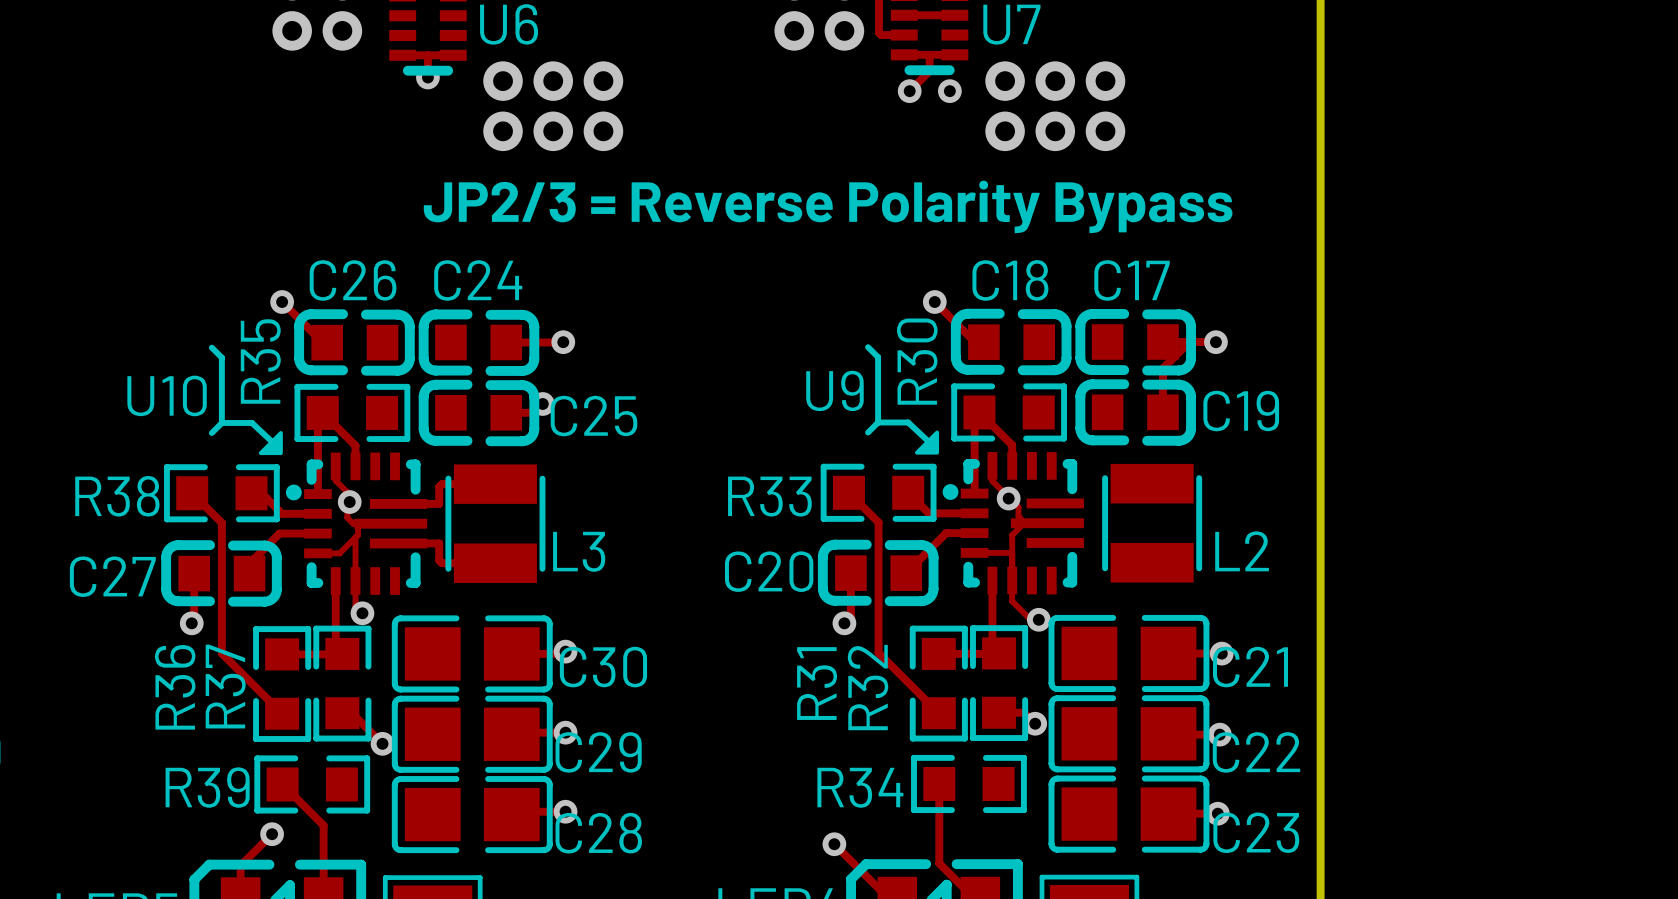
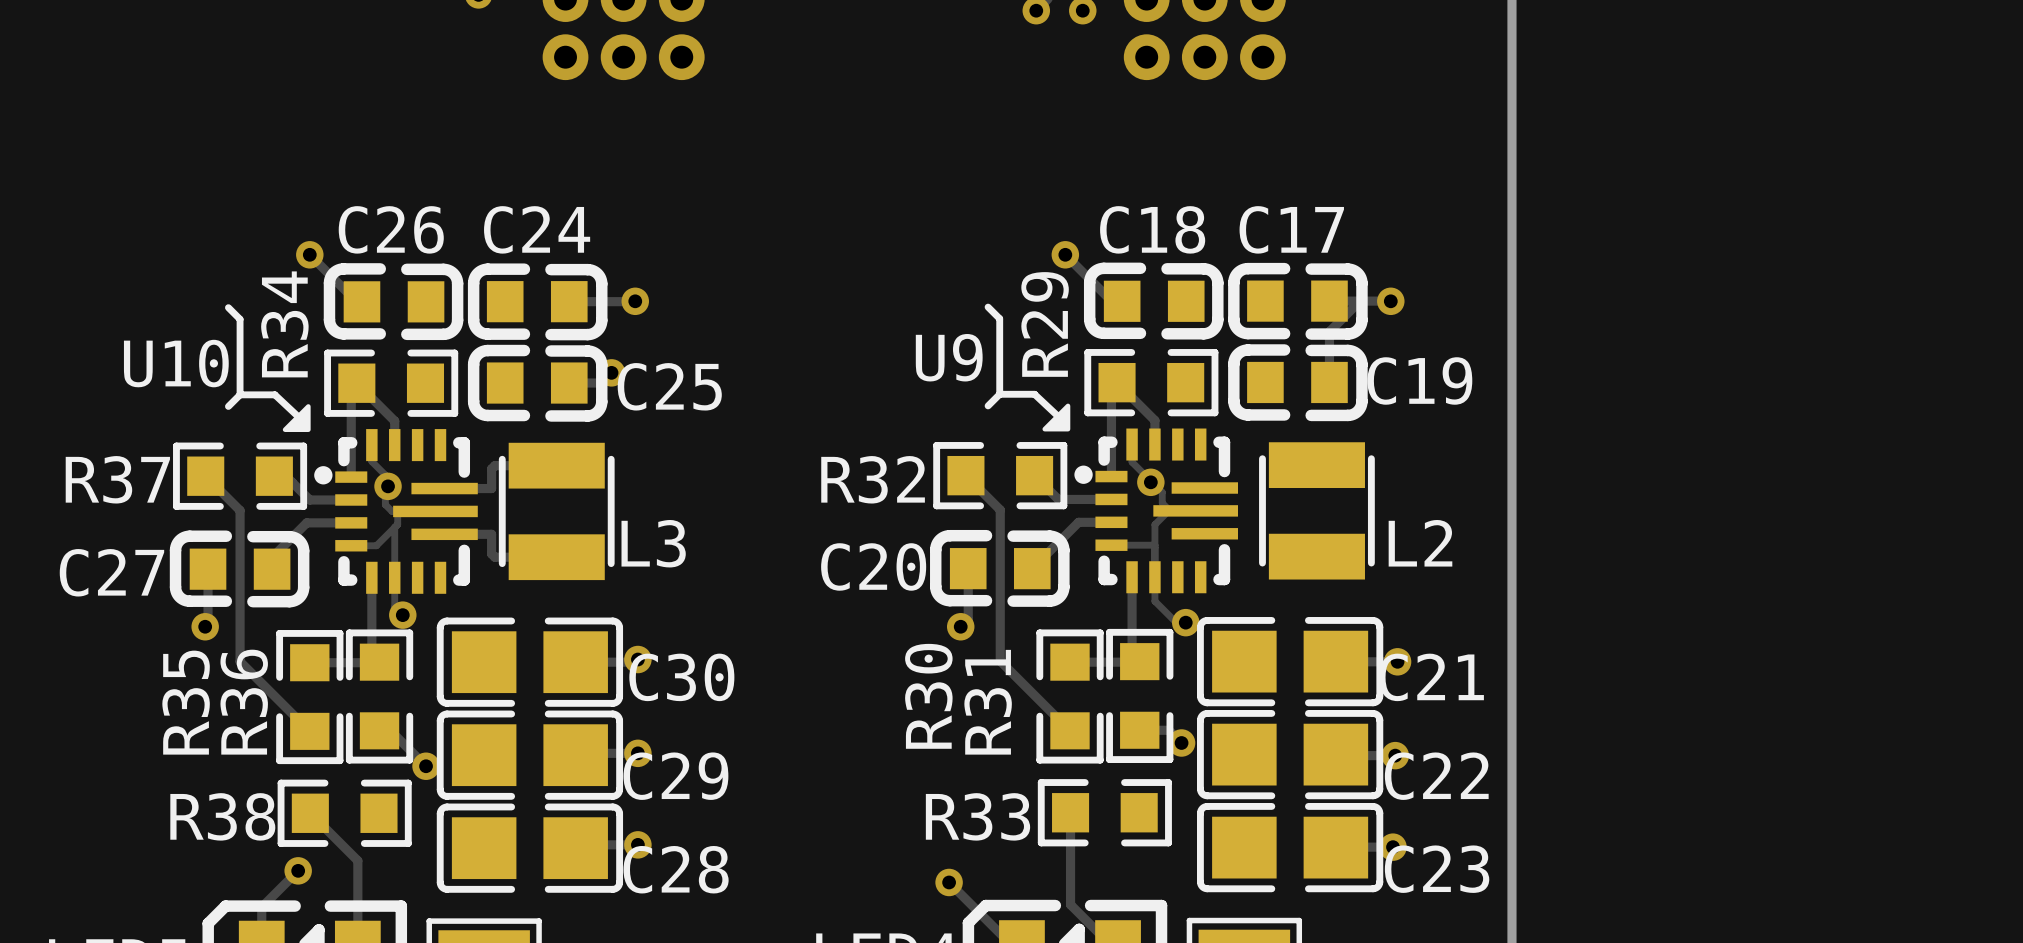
text: JP2/3 = Reverse Polarity Bypass (828, 206) -> none
R35 name: R35 (260, 361) -> R34 (284, 324)
R30 name: R30 (917, 361) -> R29 (1045, 324)
R38 name: R38 (117, 496) -> R37 (117, 479)
R33 name: R33 (769, 496) -> R32 (873, 479)
R31 name: R31 (817, 683) -> R30 (928, 696)
R37 name: R37 (225, 686) -> R36 (244, 702)
R36 name: R36 (175, 687) -> R35 (186, 702)
R32 name: R32 (868, 687) -> R31 (988, 702)
R39 name: R39 (207, 787) -> R38 (222, 816)
R34 name: R34 (860, 787) -> R33 (977, 816)

